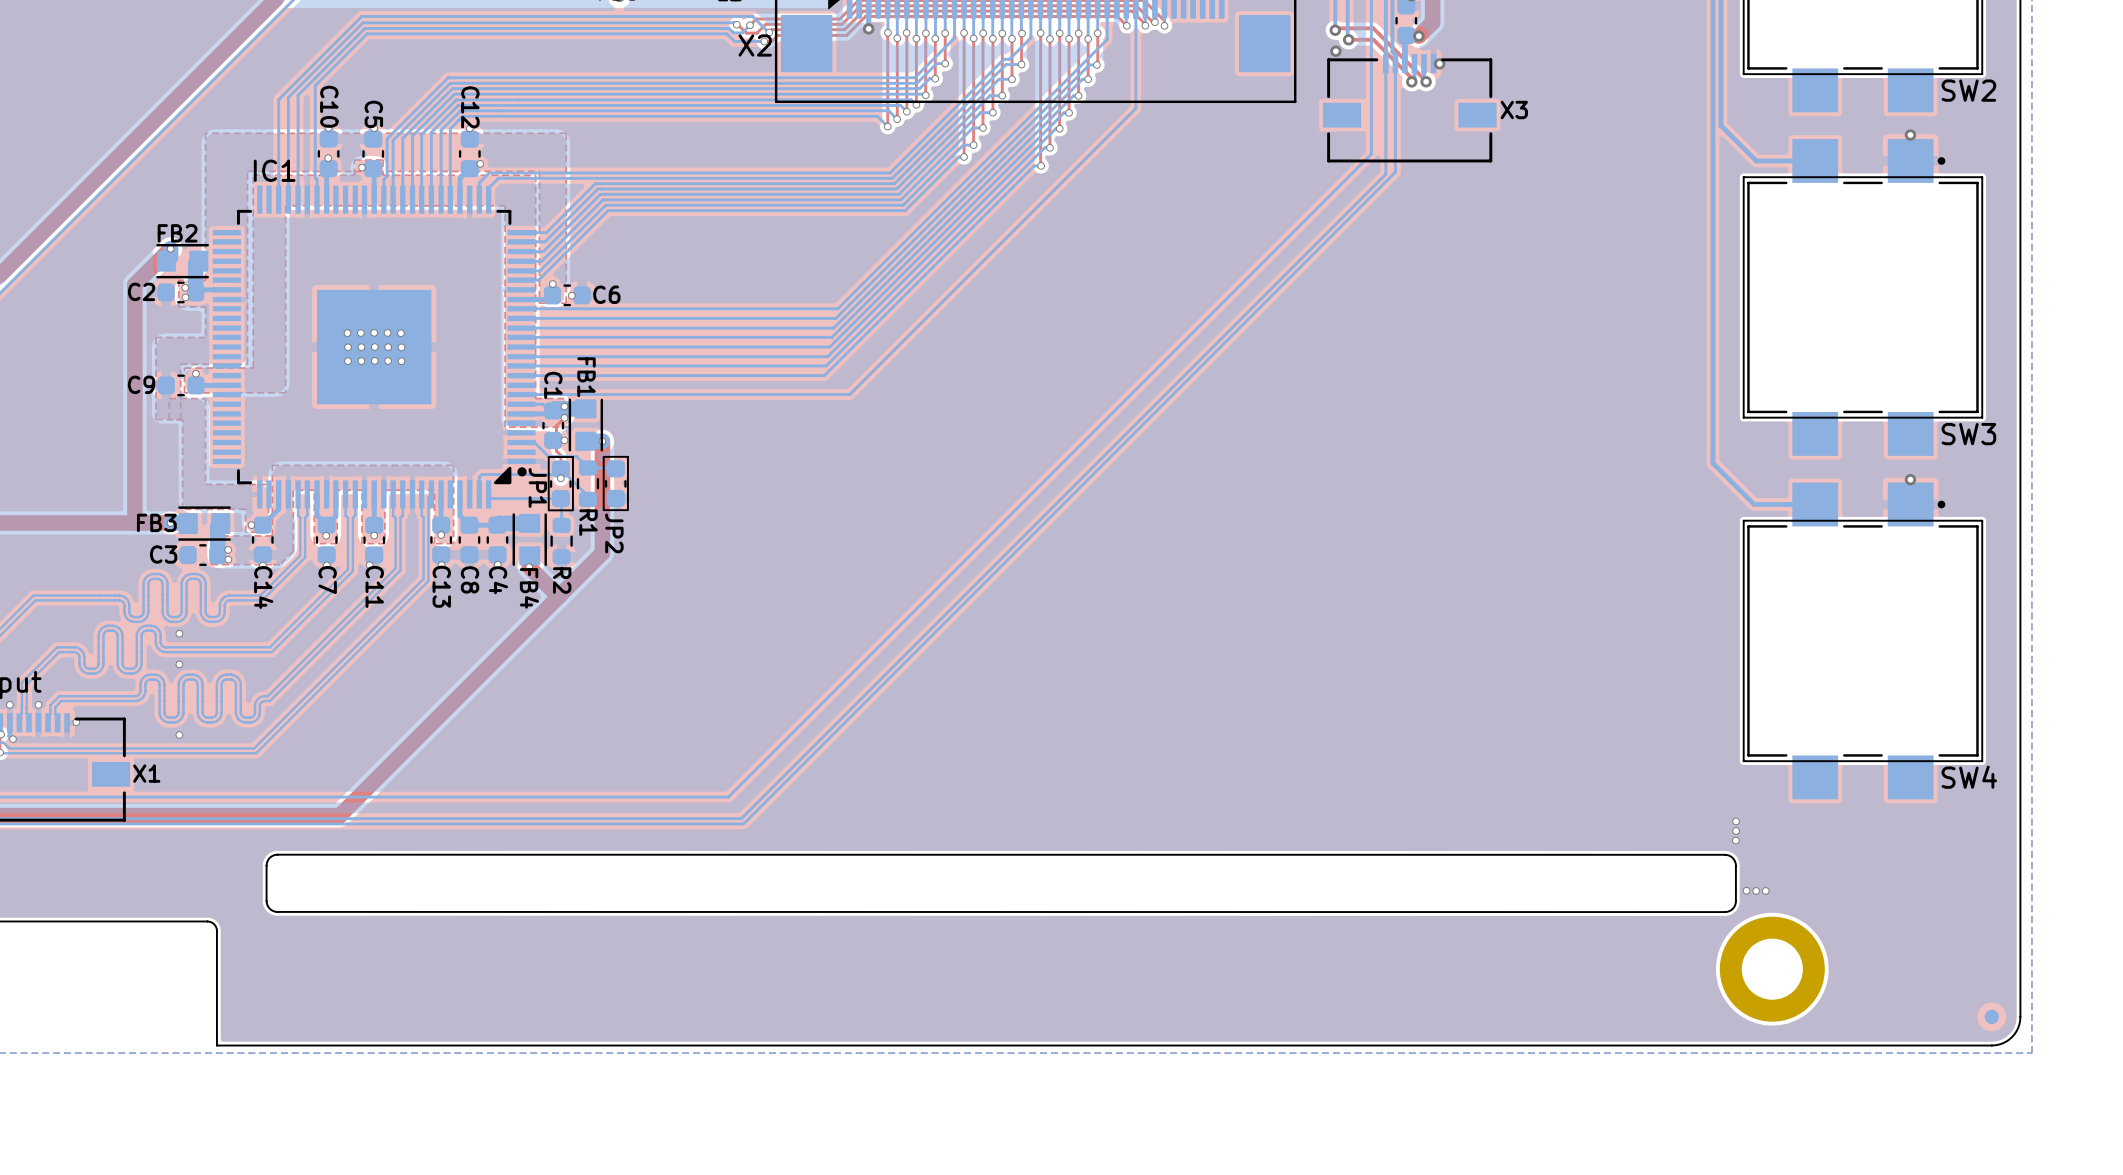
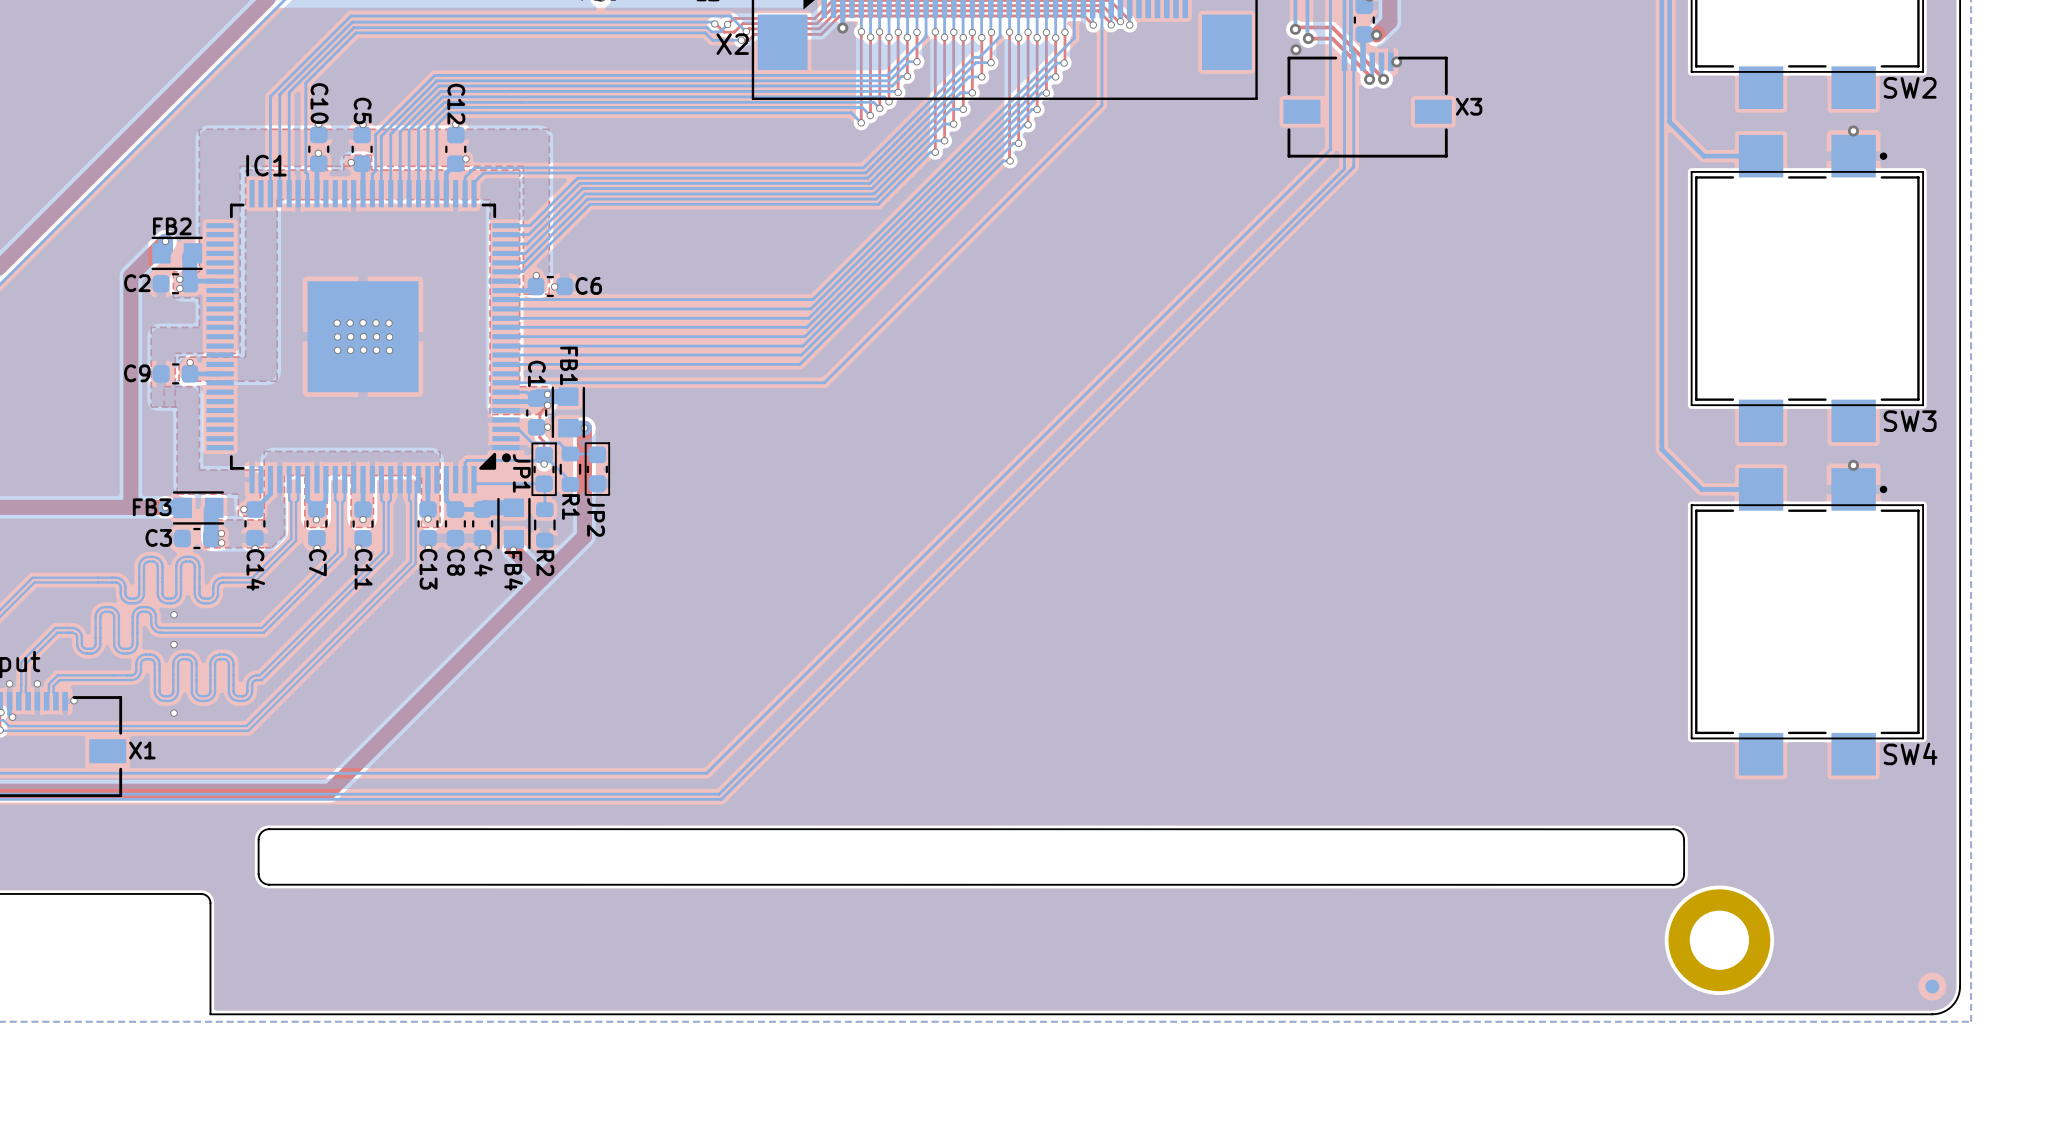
via: (1736, 821) -> none
via: (1736, 830) -> none
via: (1735, 840) -> none
via: (1746, 890) -> none
via: (1756, 890) -> none
via: (1765, 890) -> none

